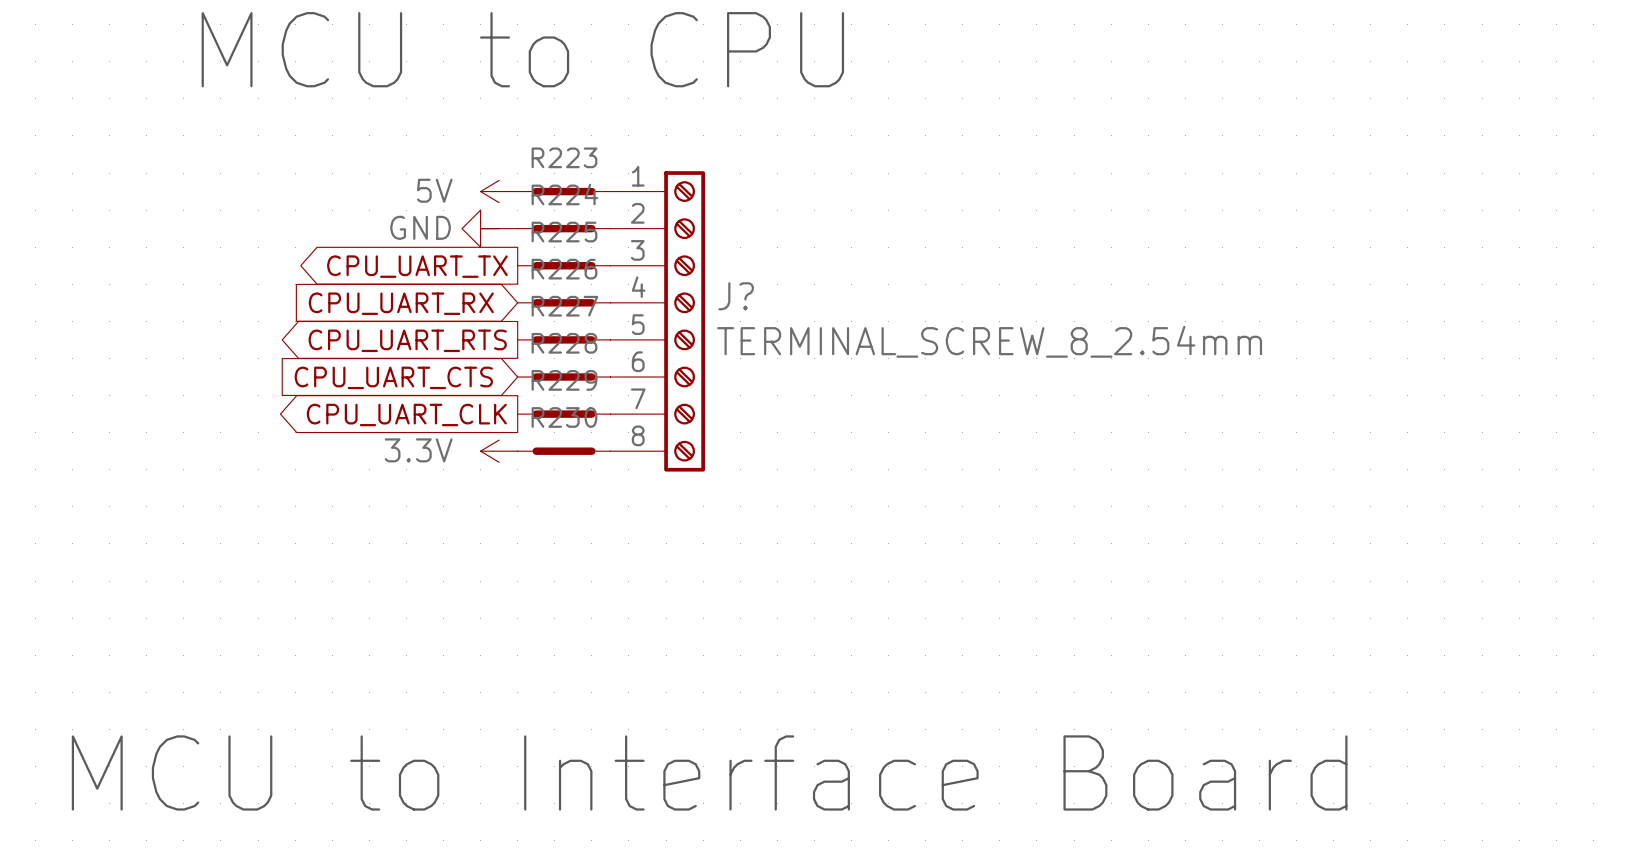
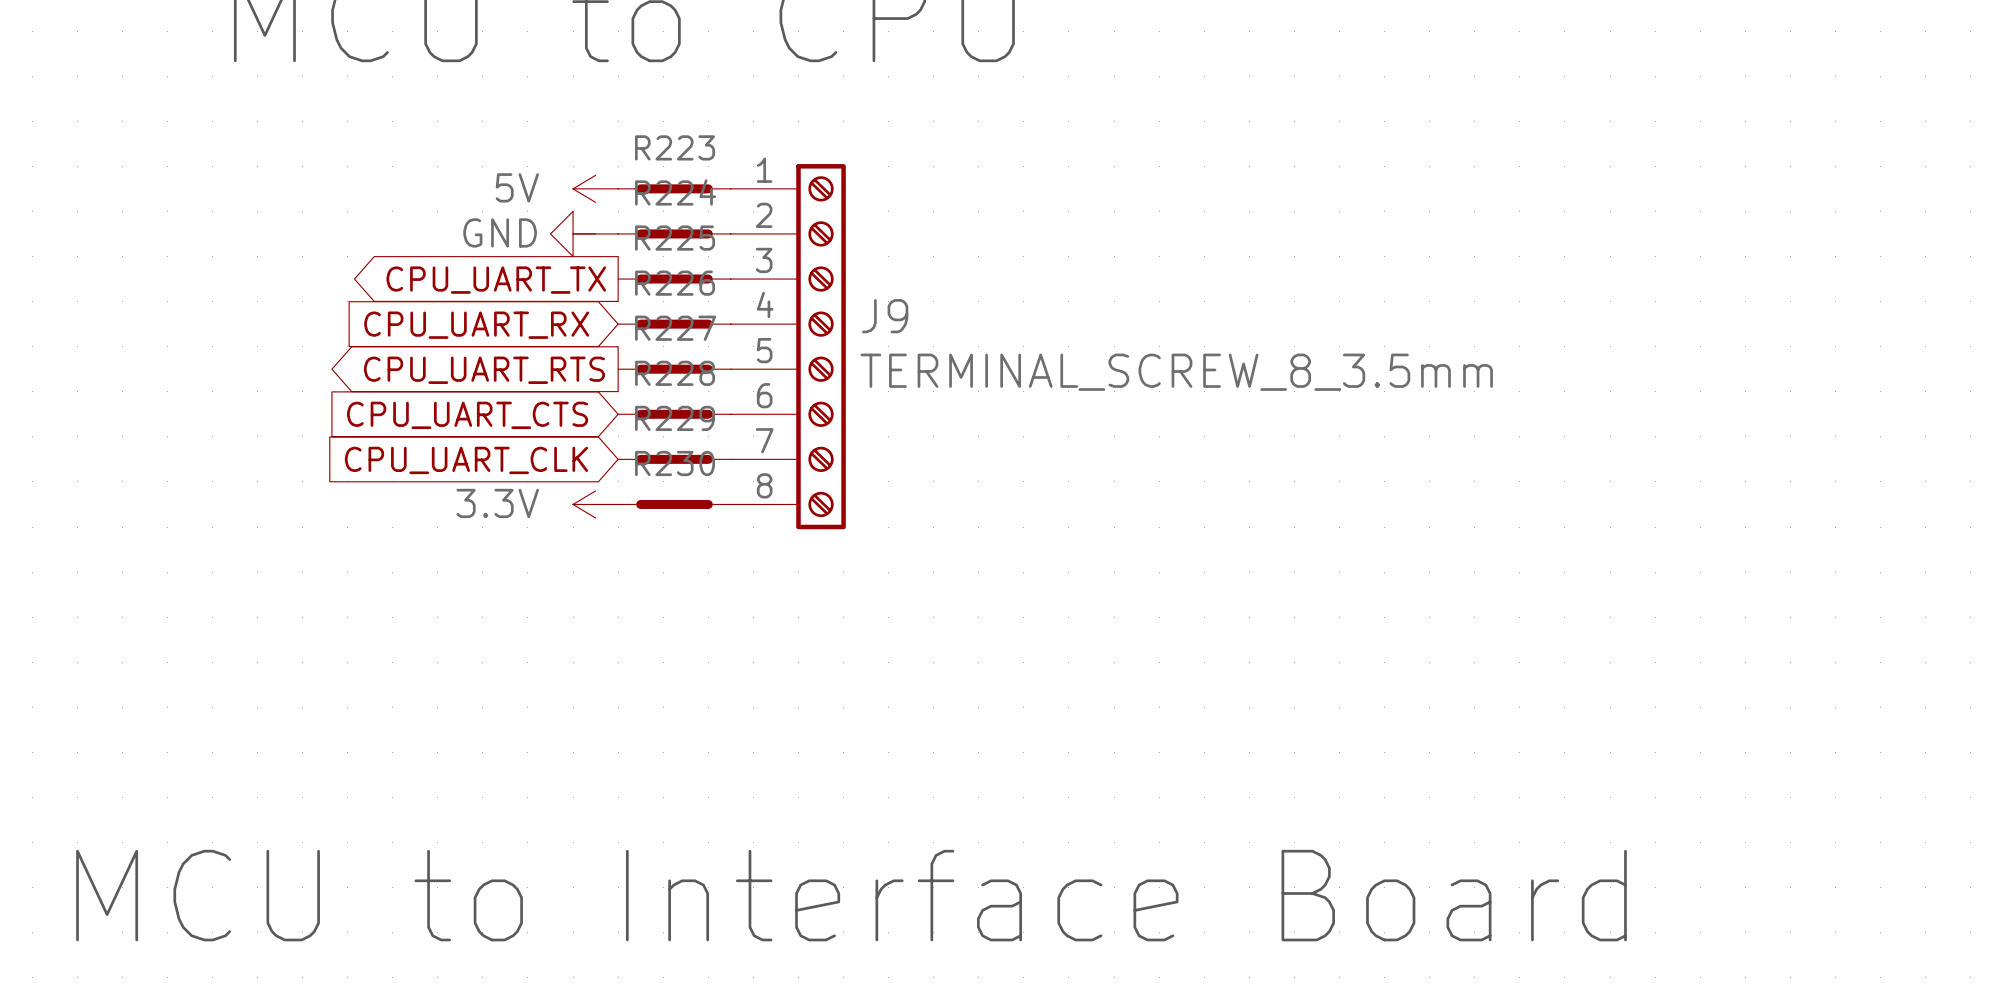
J? name: J? (736, 296) -> J9 (885, 316)
J? value: TERMINAL_SCREW_8_2.54mm (989, 341) -> TERMINAL_SCREW_8_3.5mm (1176, 372)
global label shape: output (406, 414) -> input (466, 460)

